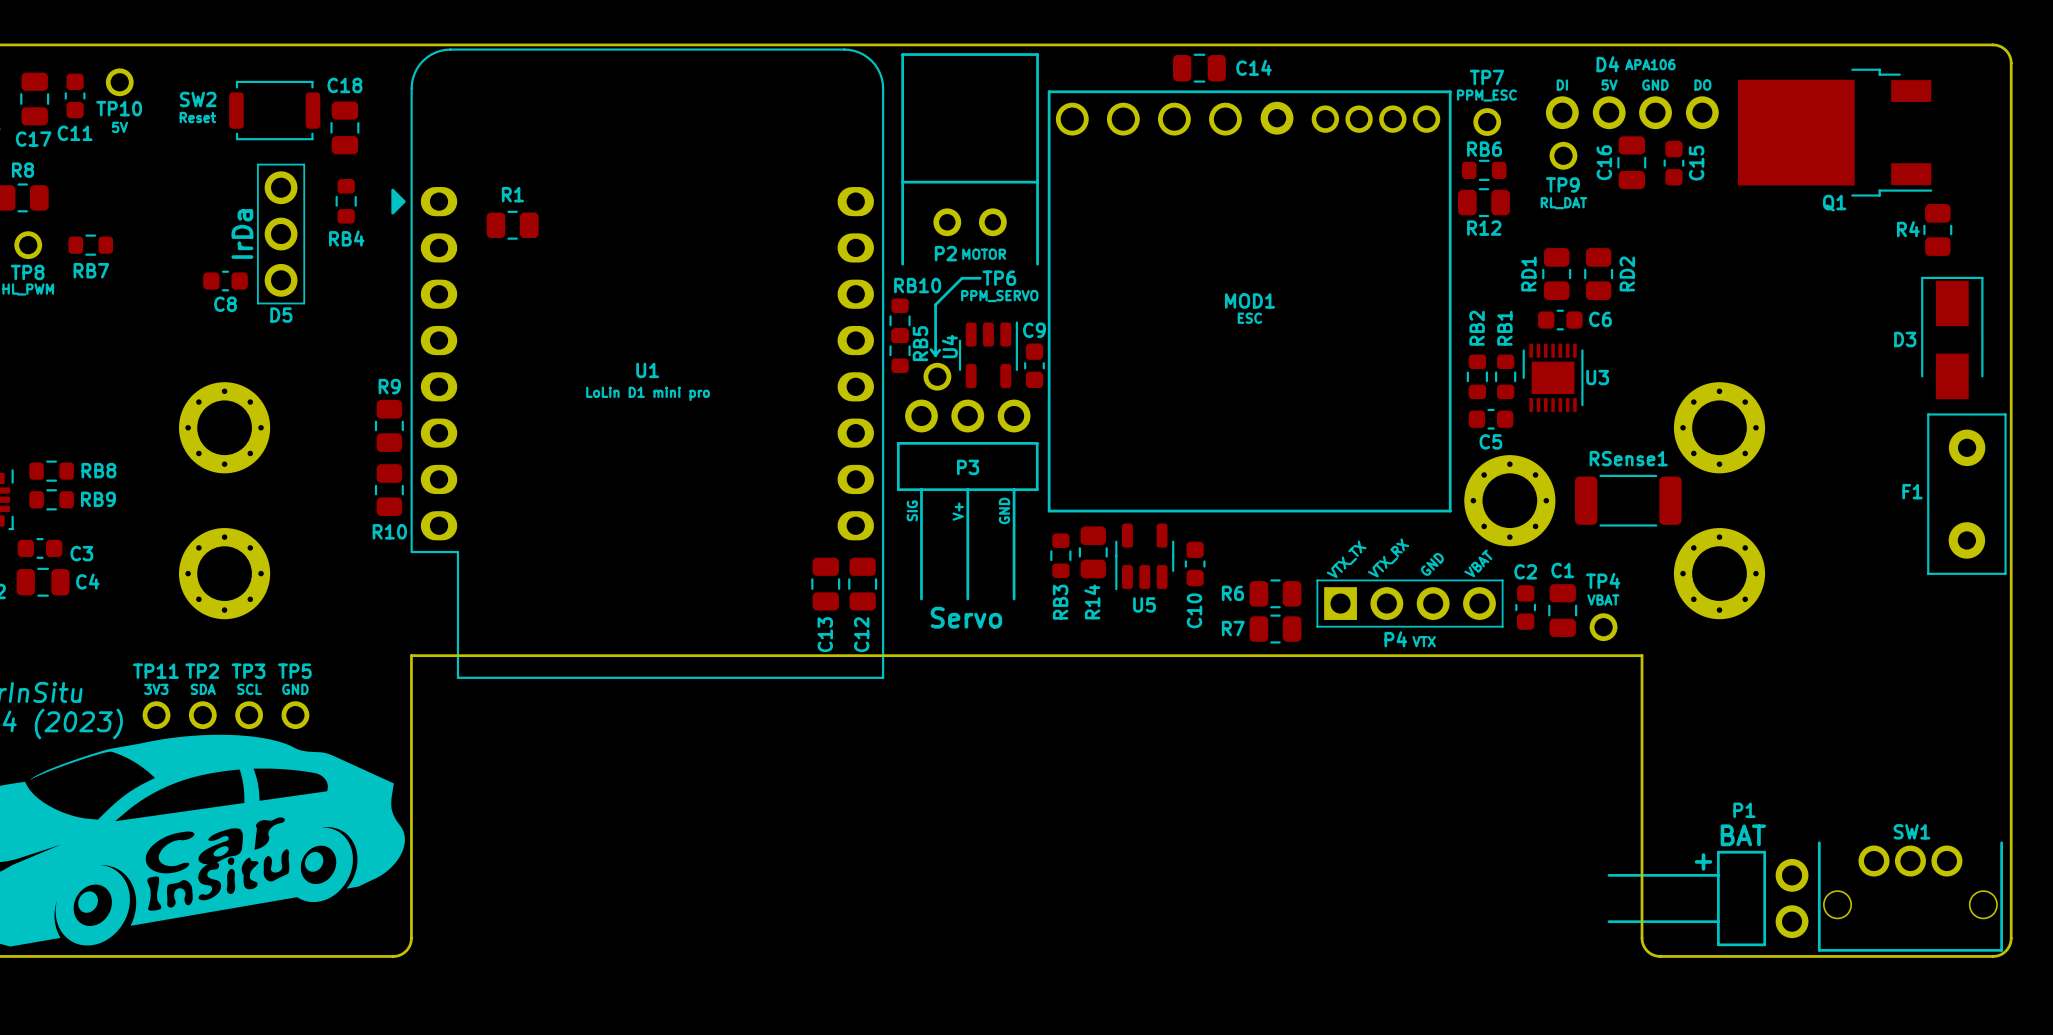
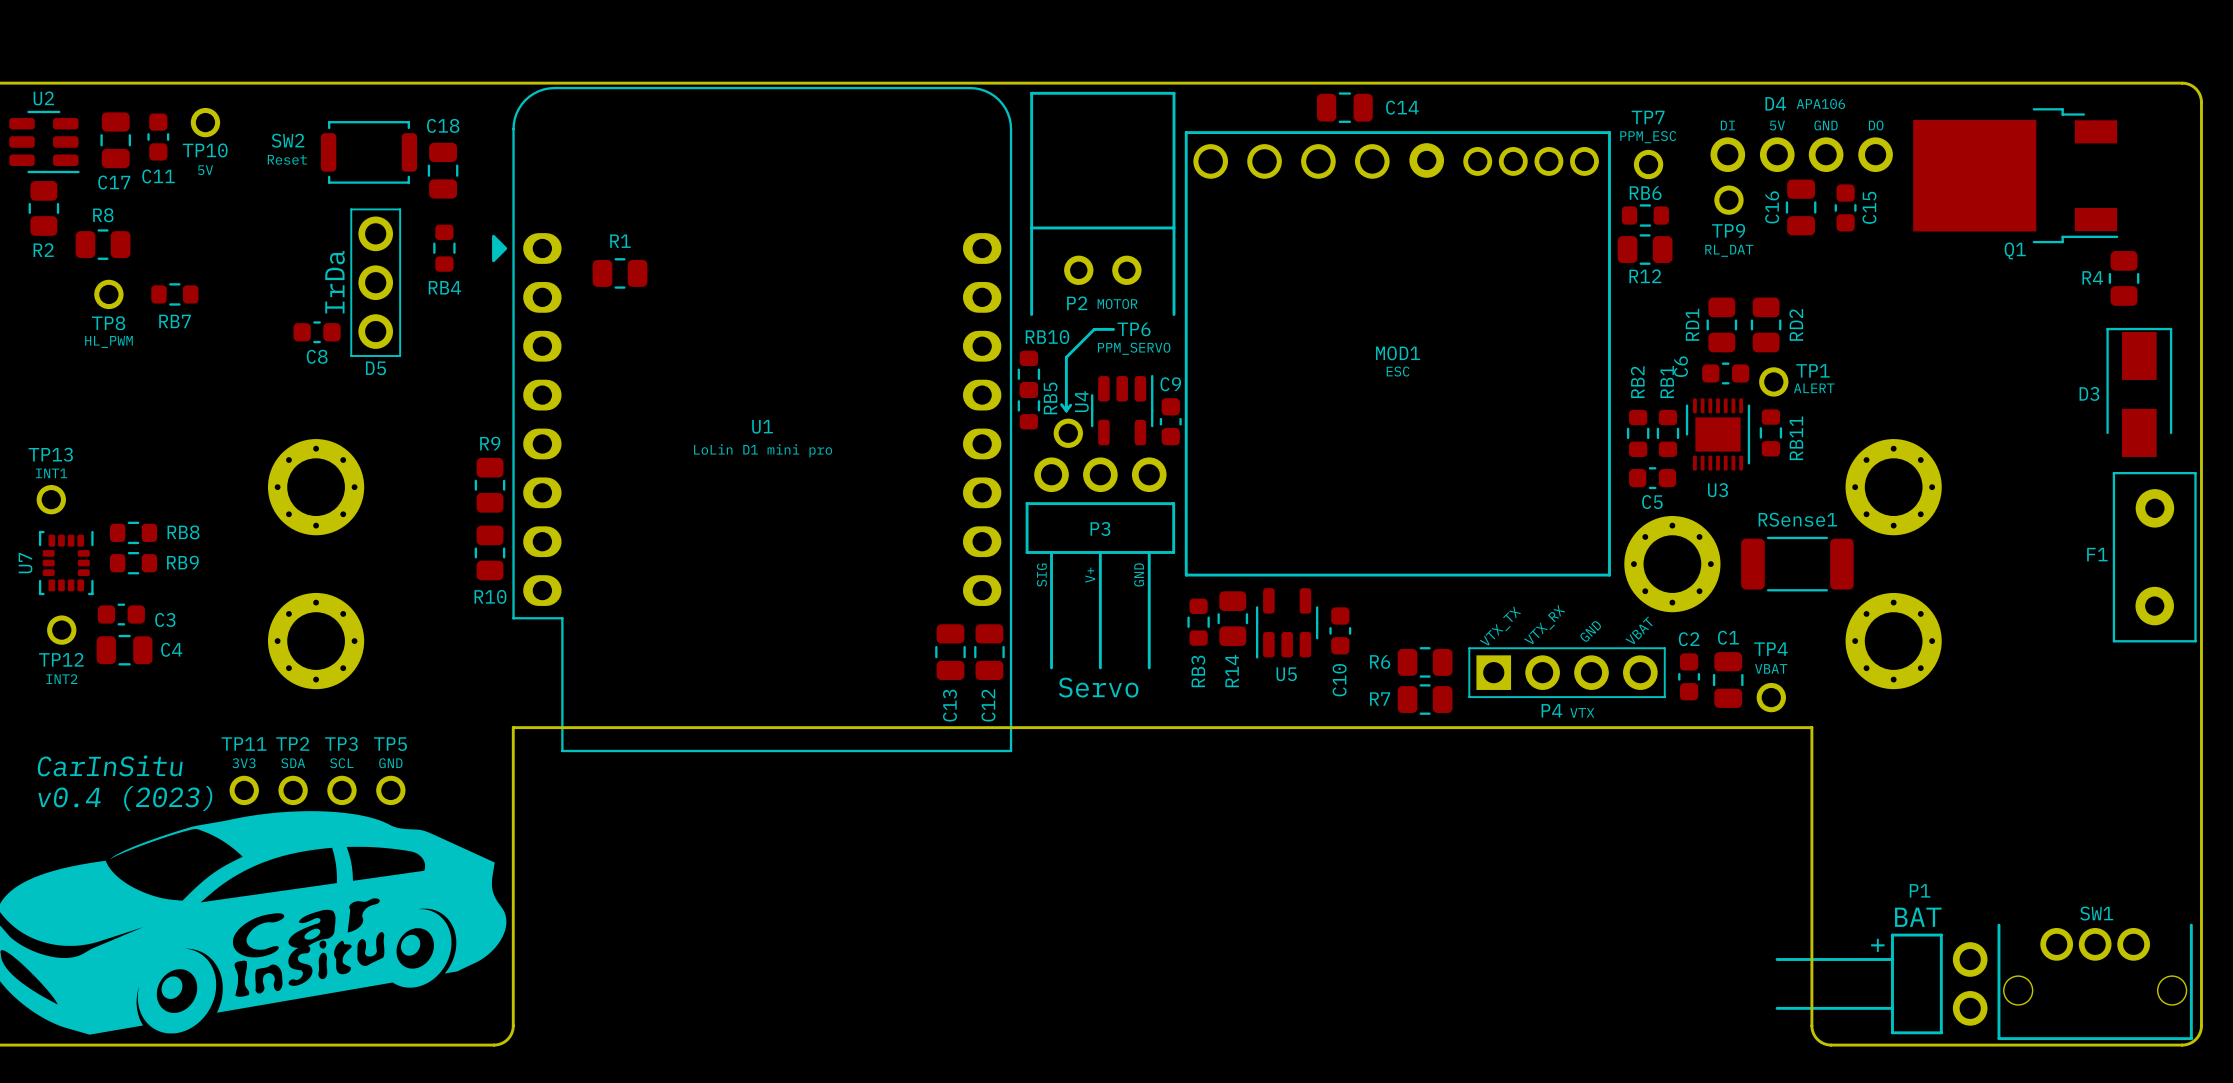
C6 name rotation: 0° (1600, 319) -> 90° counterclockwise (1680, 366)
C6 name position: C6 (1600, 319) -> C6 (1680, 366)
TP1: none -> (1773, 381)
RB11: none -> (1770, 432)
U3 name position: U3 (1597, 377) -> U3 (1717, 490)

